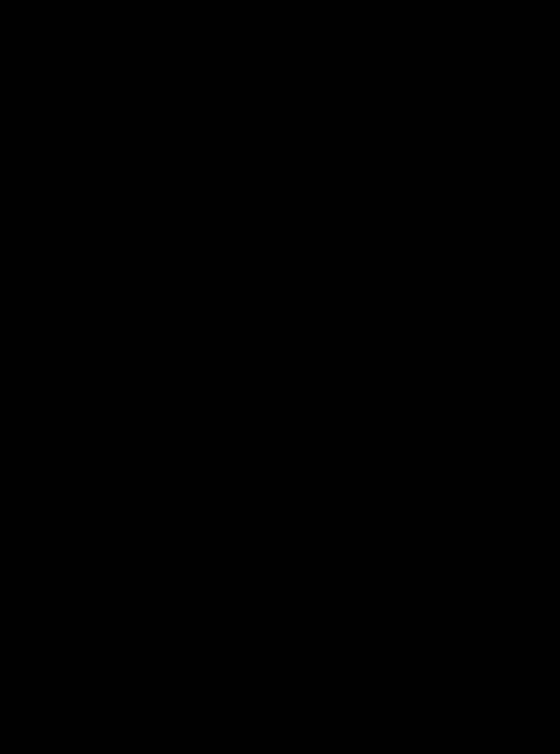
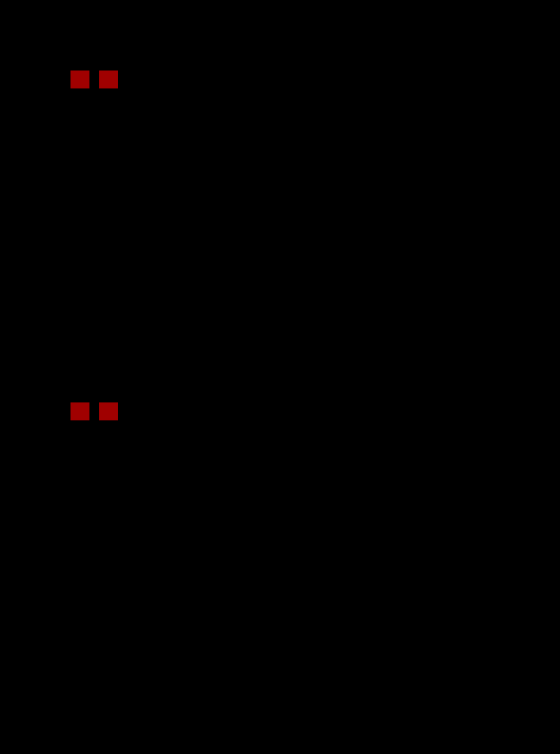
part: none -> (94, 79)
part: none -> (94, 411)

